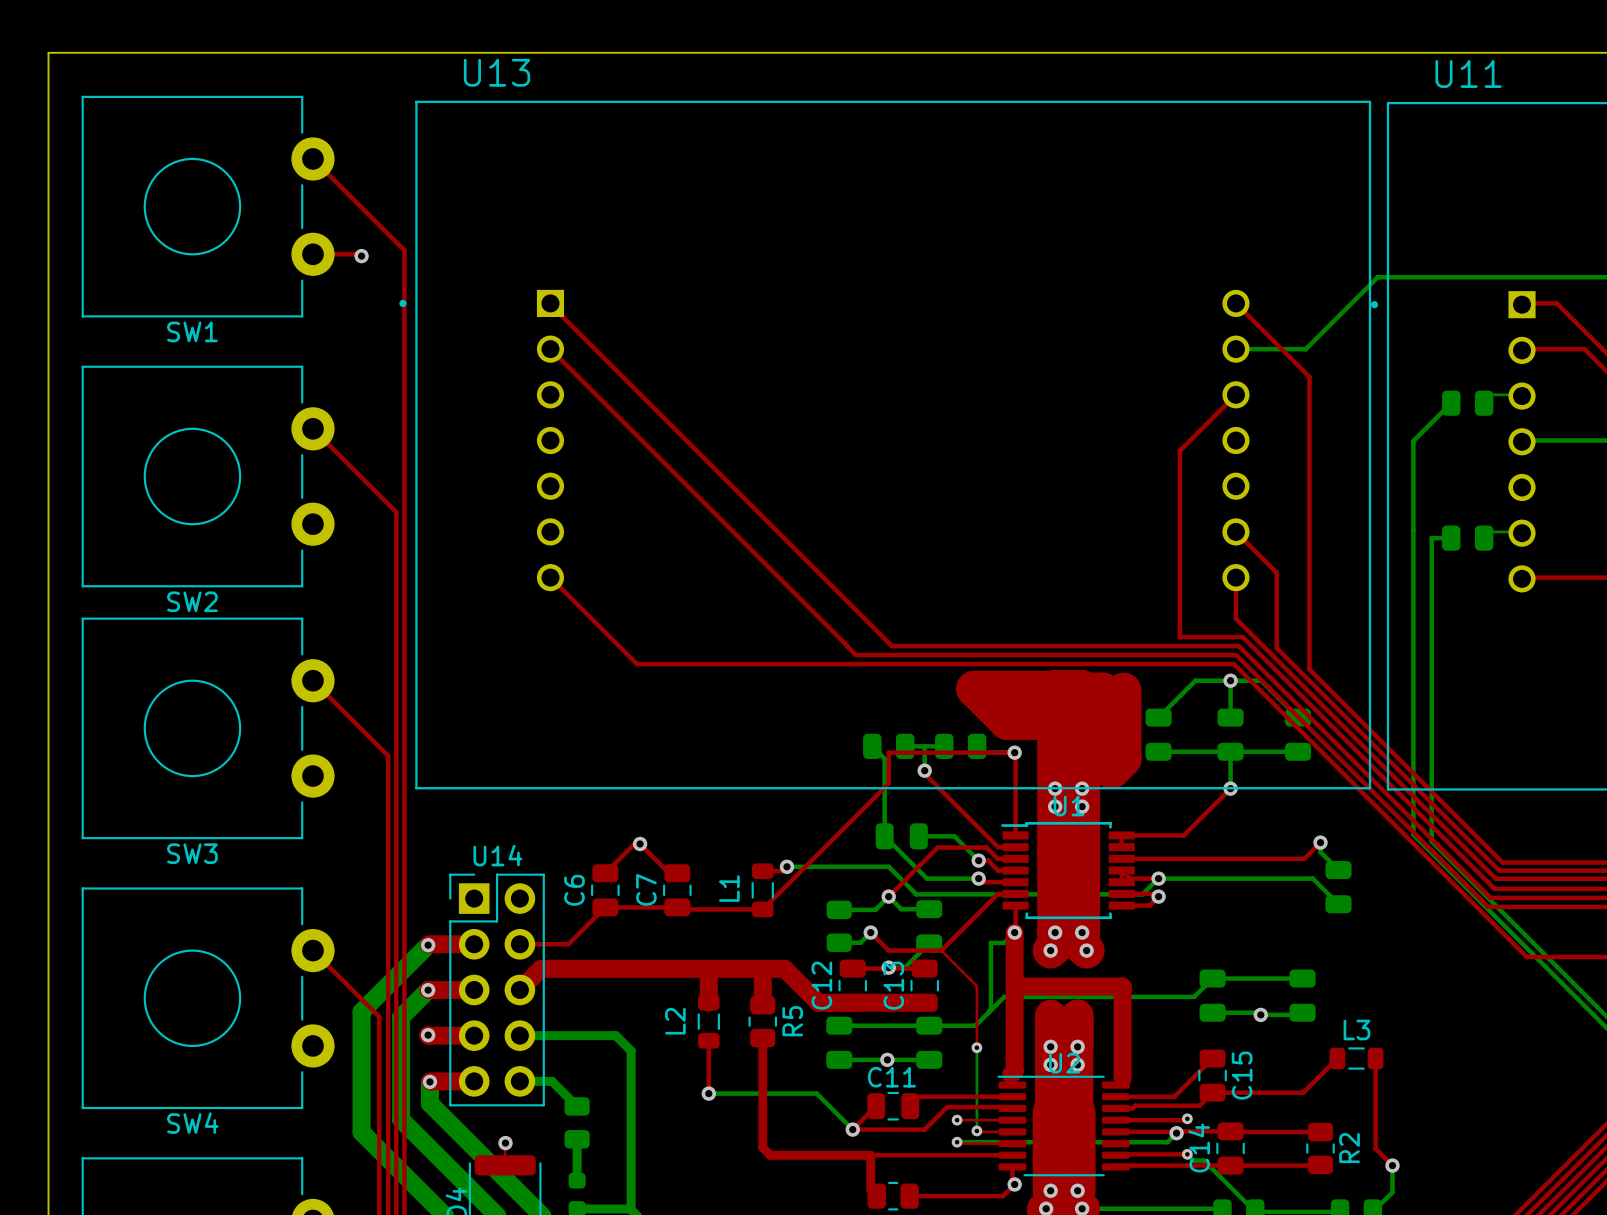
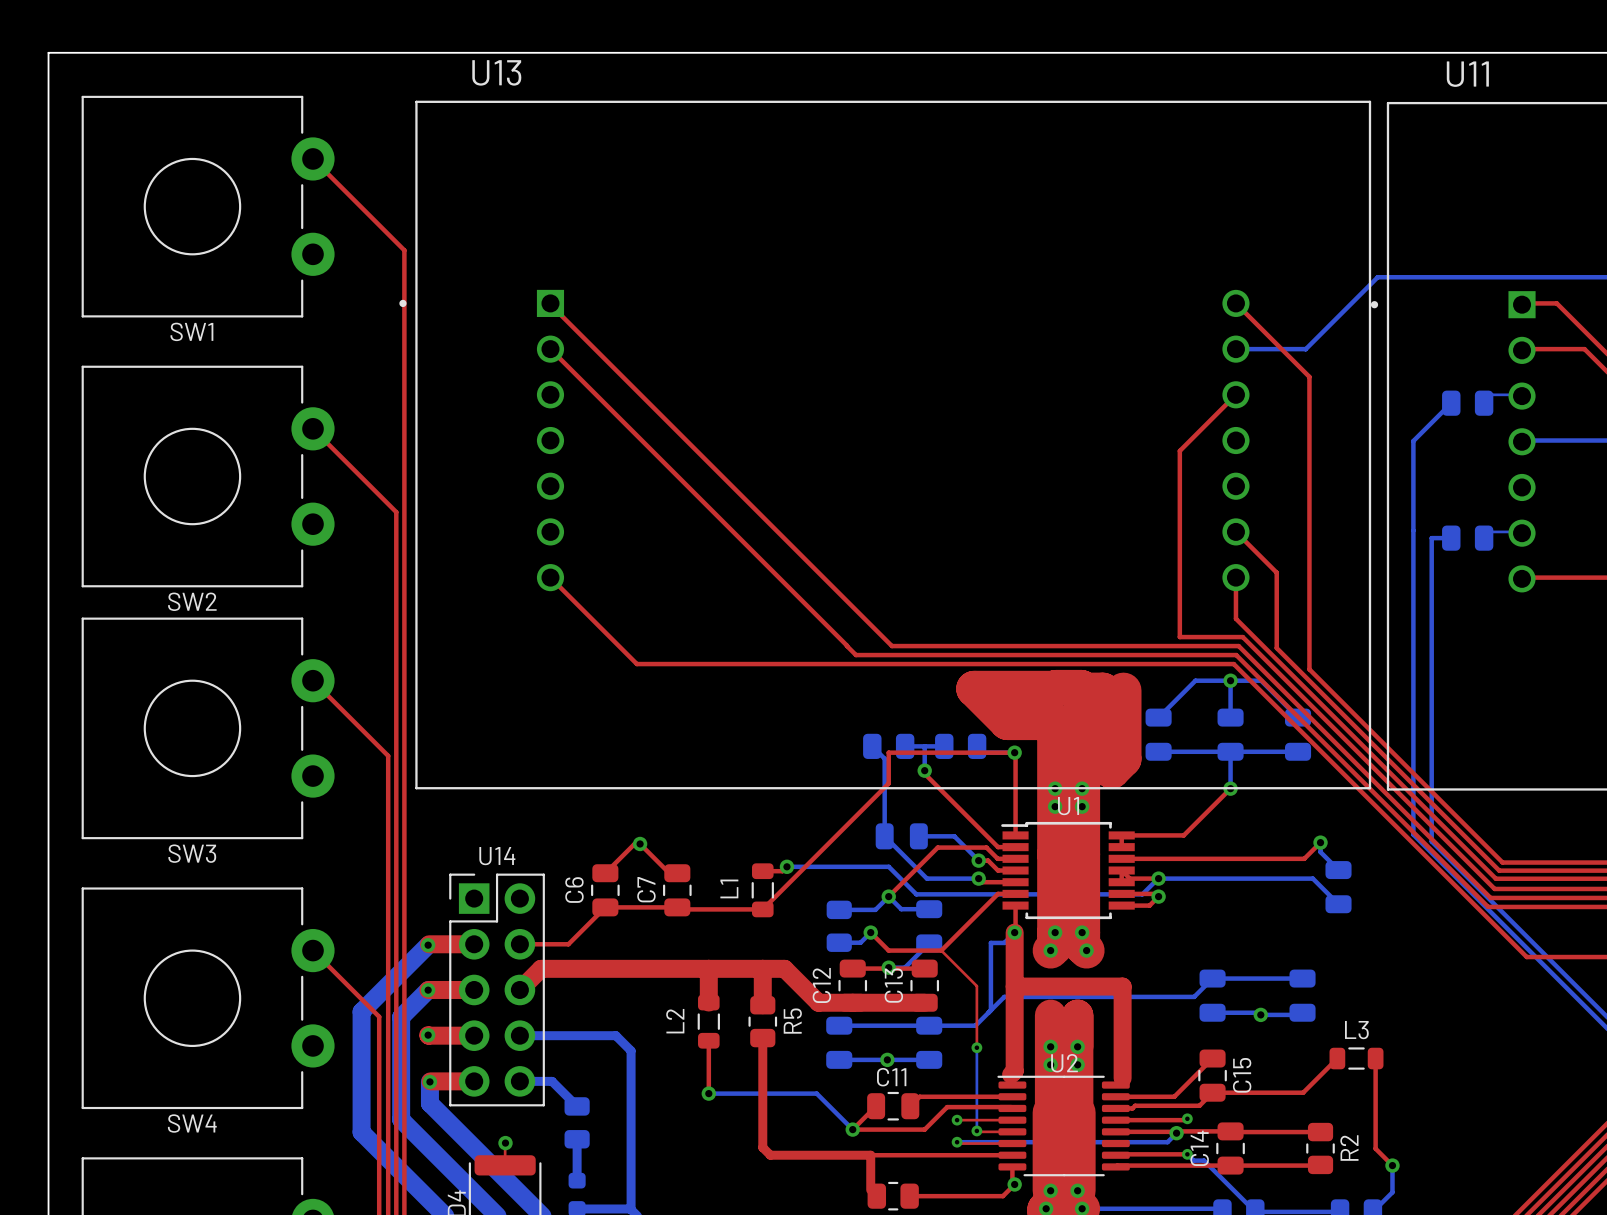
top track: (313, 254) (359, 254) (361, 256) -> none
via: (361, 256) -> none

